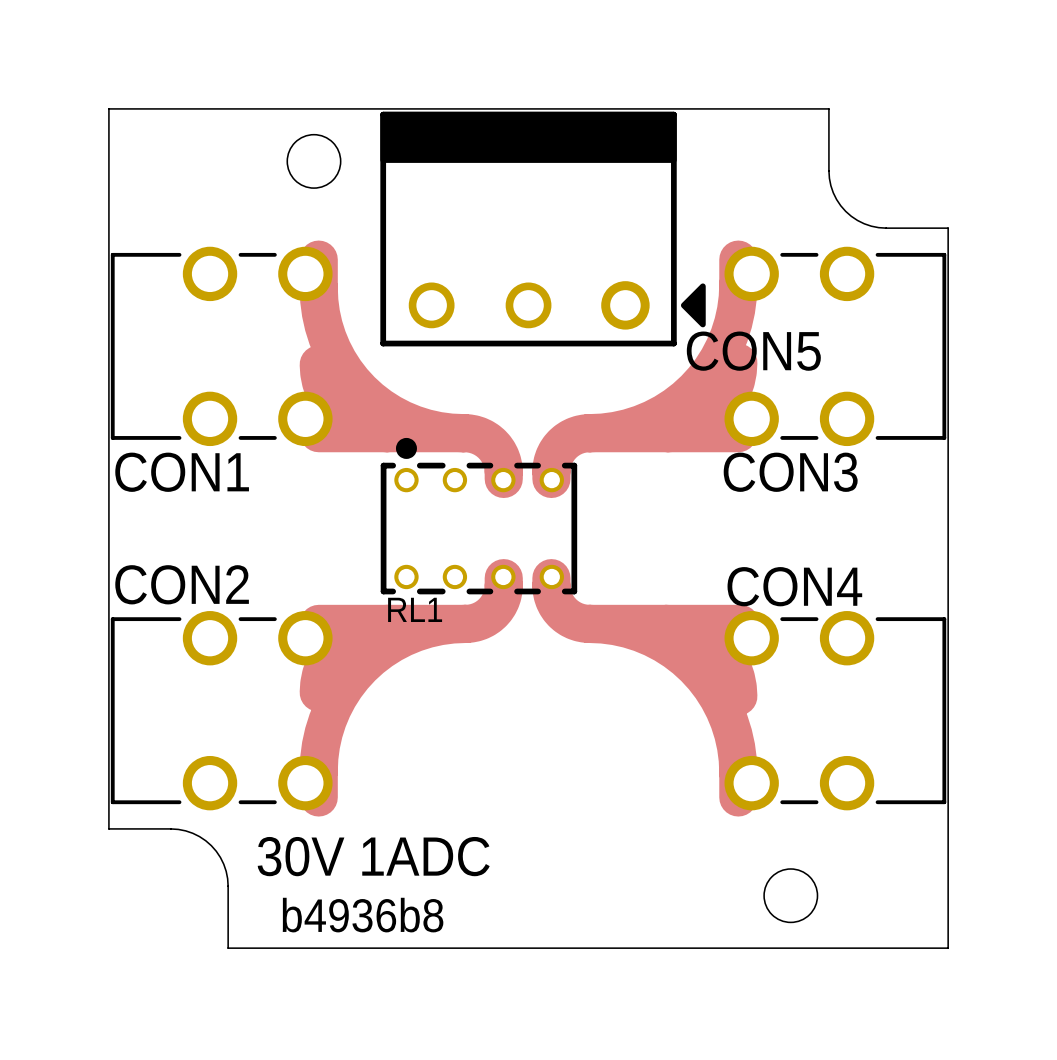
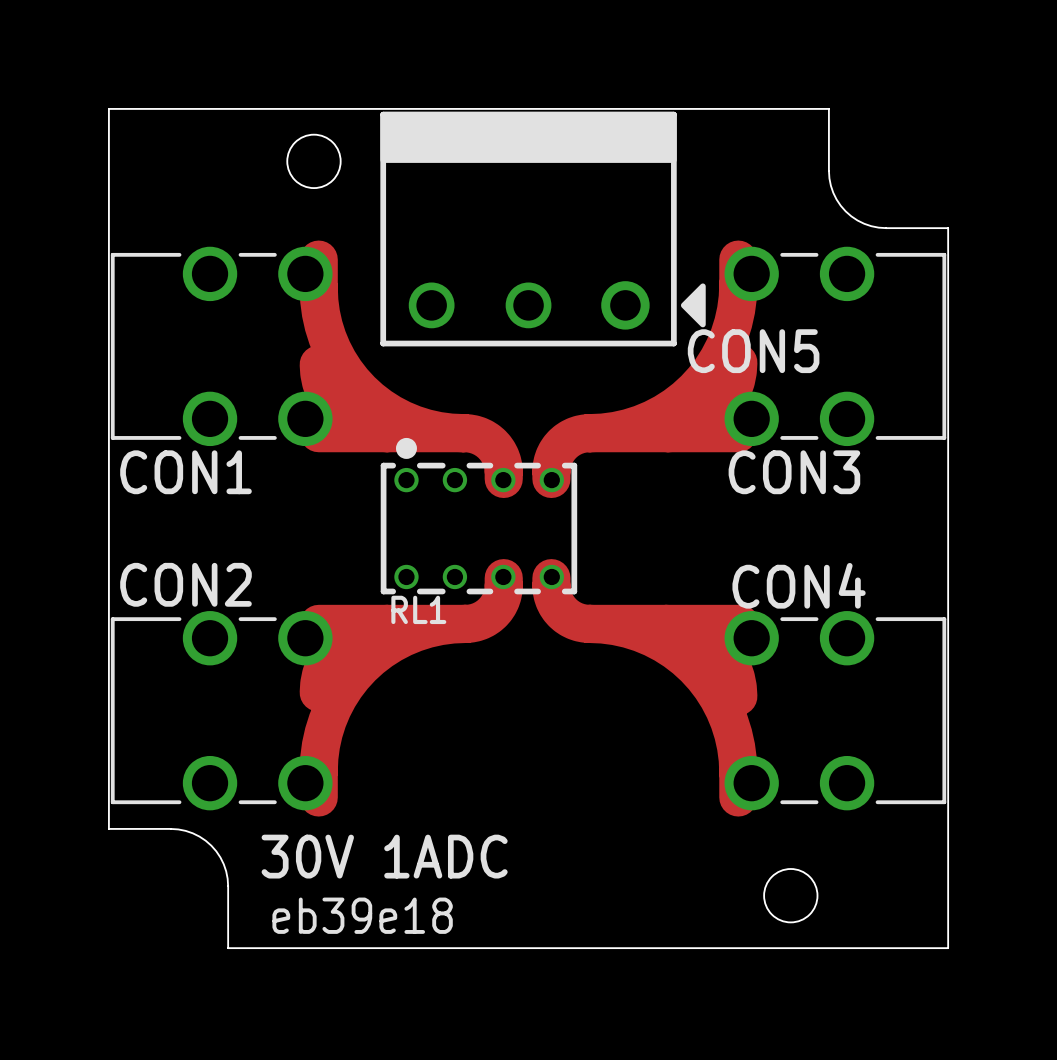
drawing shape: [282, 897, 444, 933] -> [272, 897, 453, 934]

